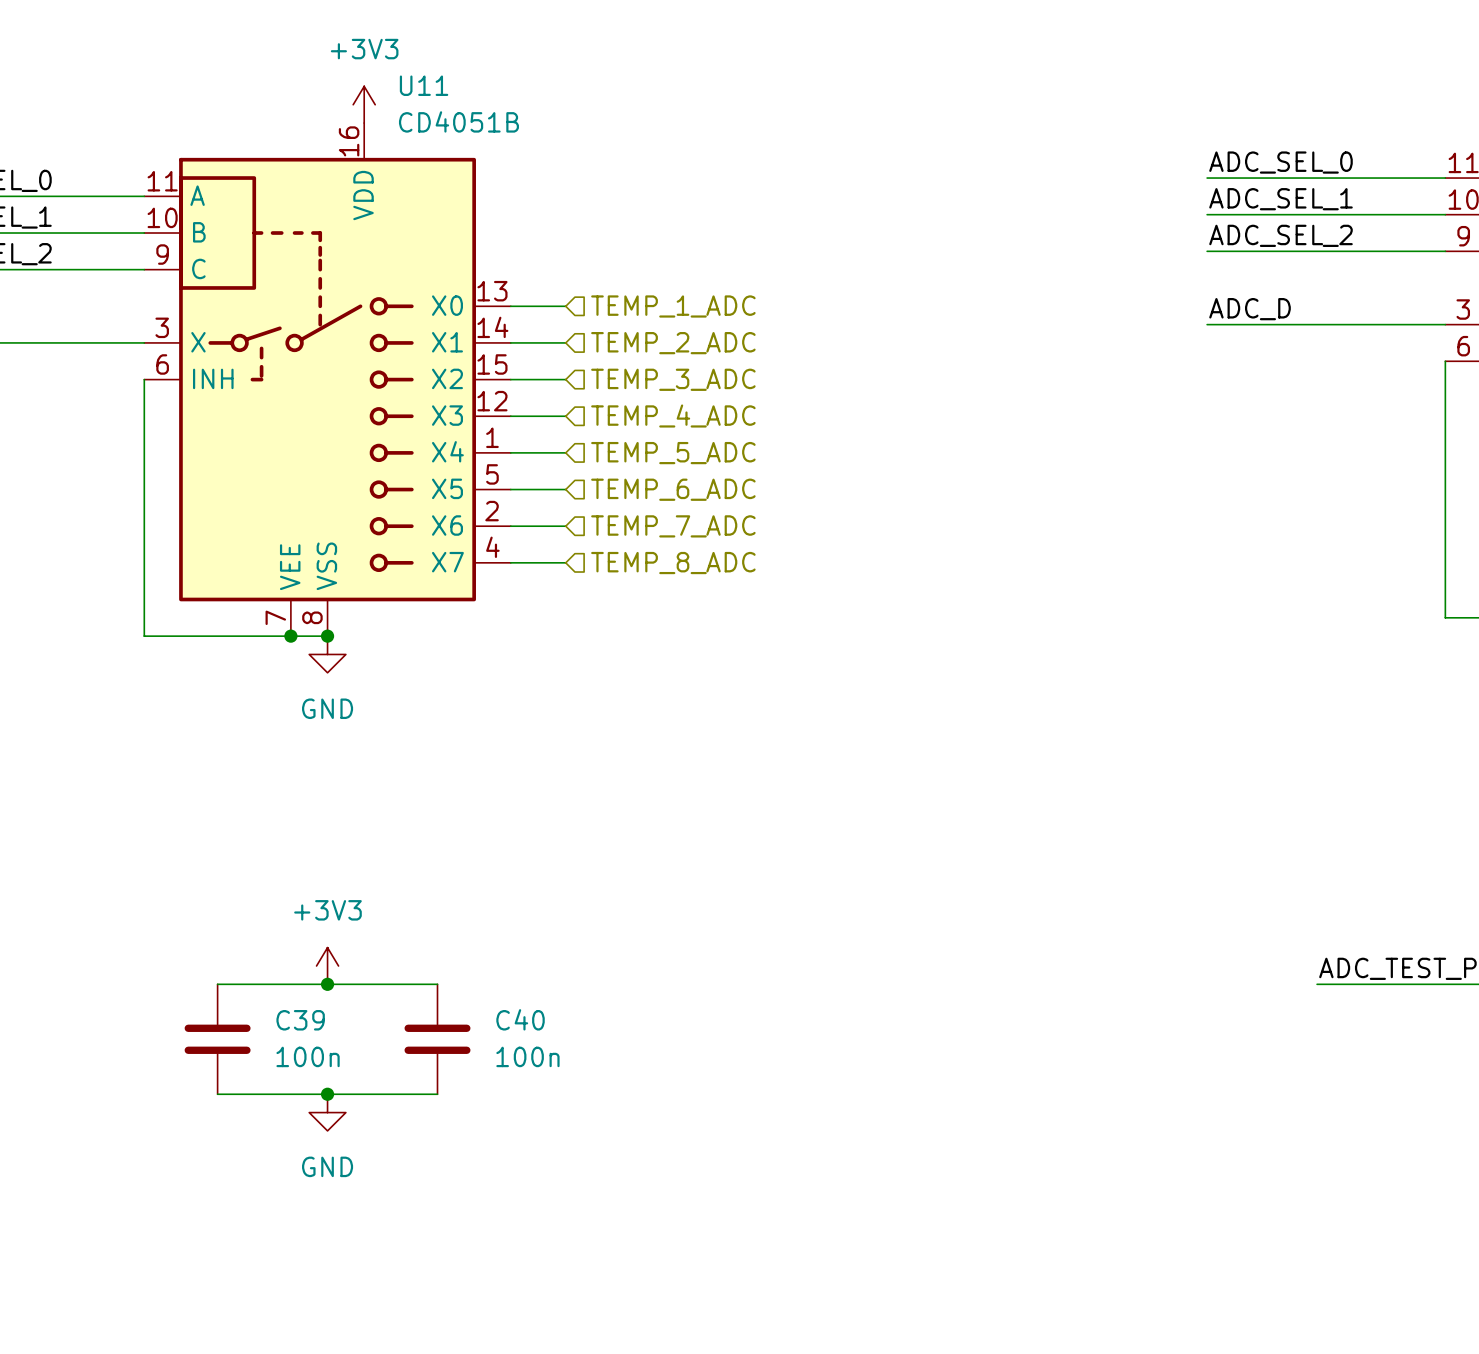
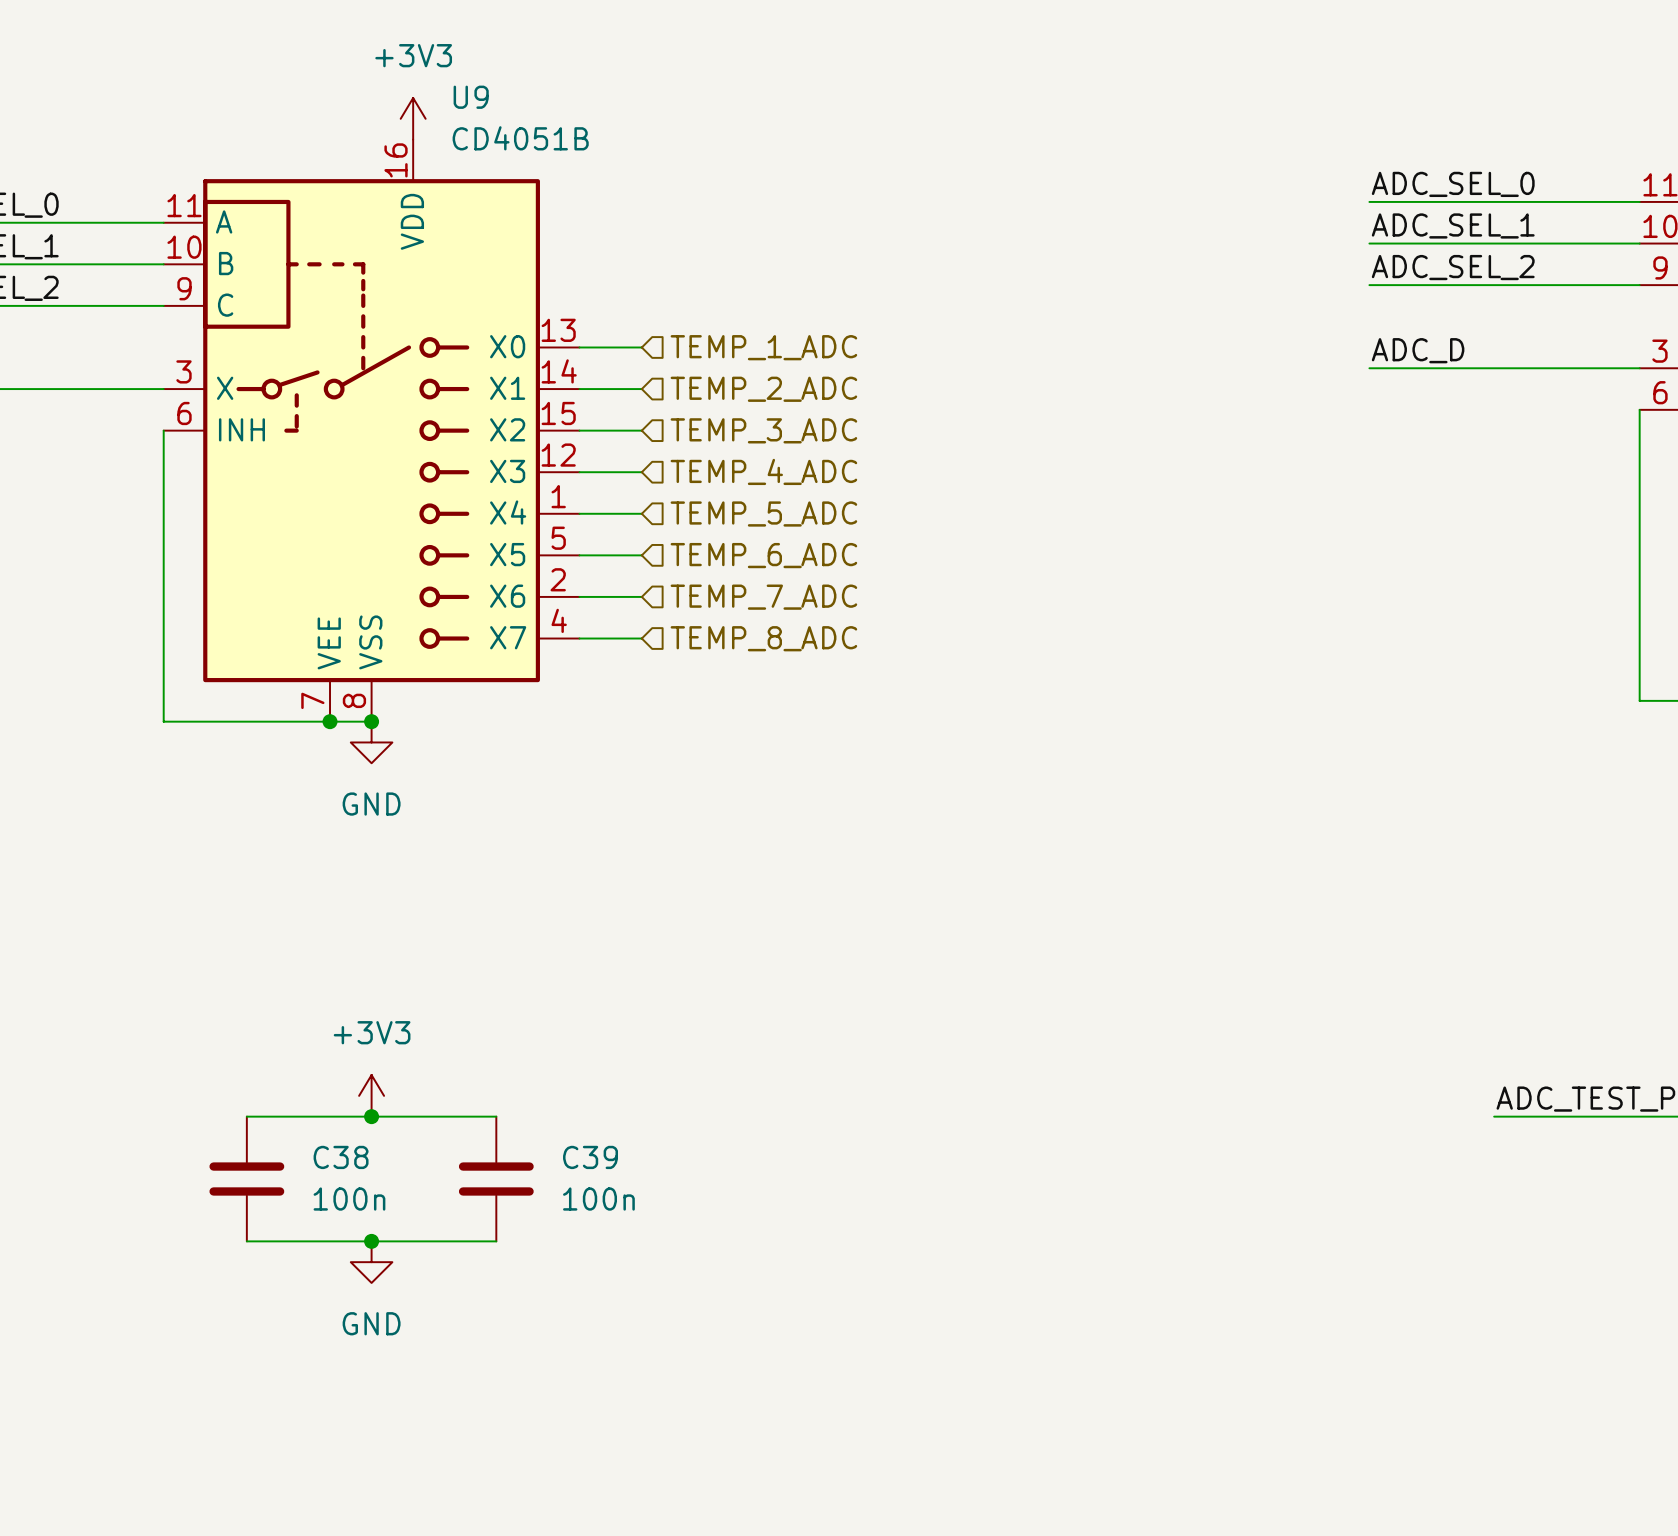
U11 name: U11 (424, 85) -> U9 (471, 97)
C40 name: C40 (520, 1019) -> C39 (590, 1157)
C39 name: C39 (300, 1020) -> C38 (341, 1157)

